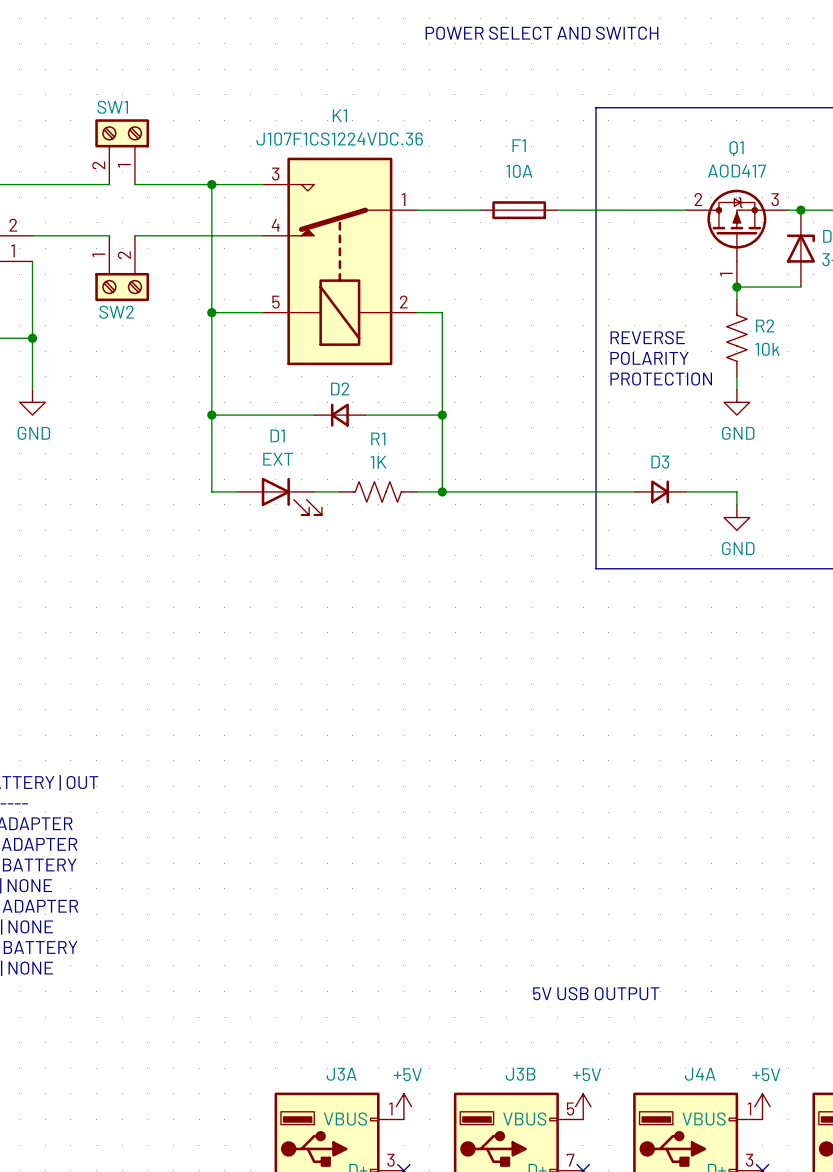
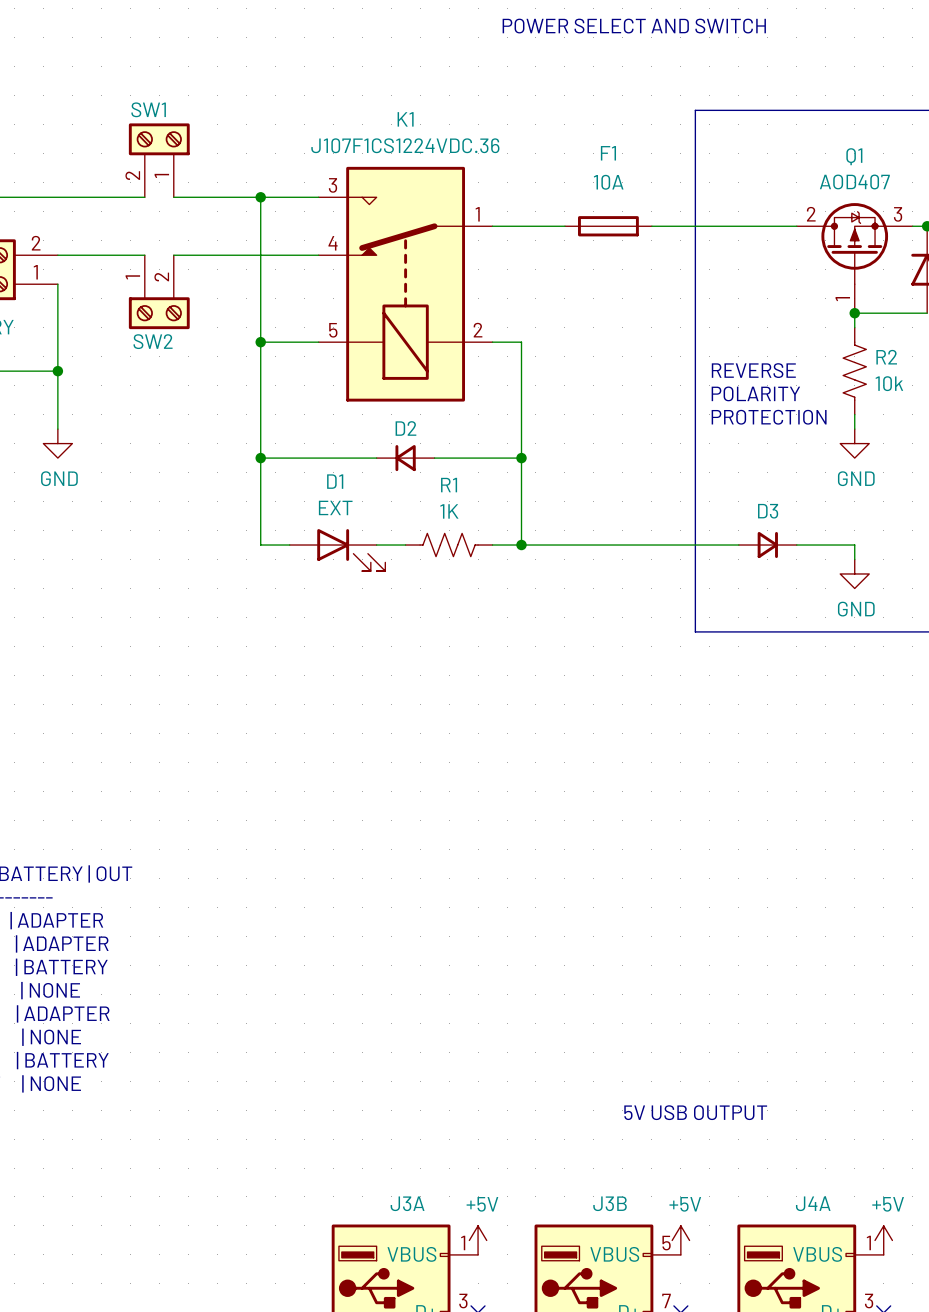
Q1 value: AOD417 (736, 171) -> AOD407 (854, 181)

